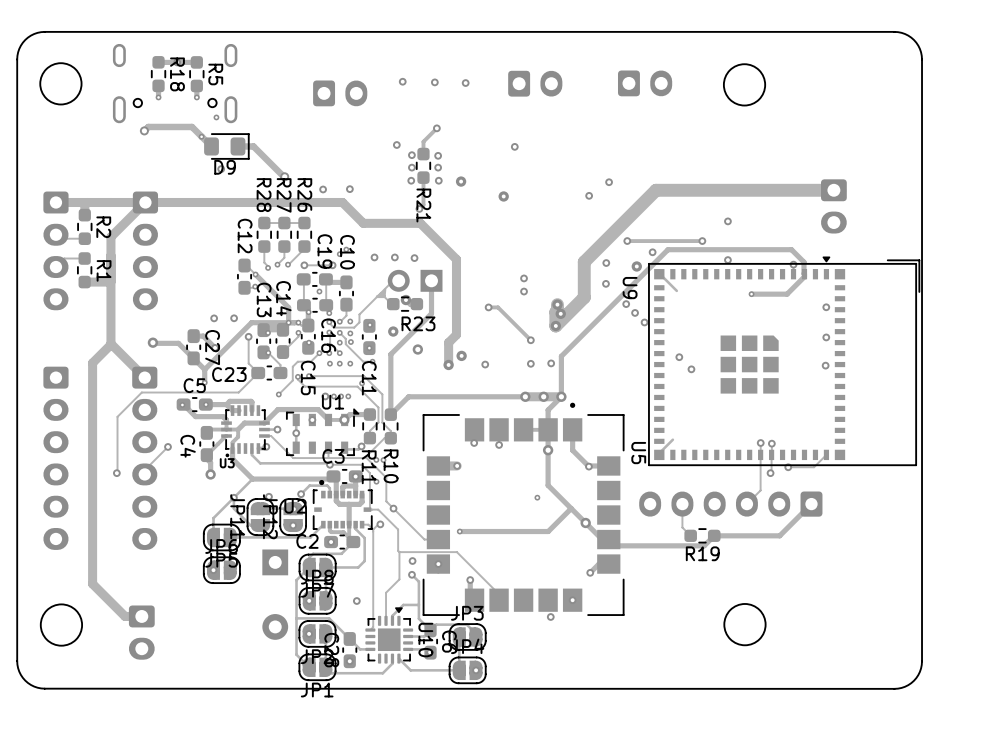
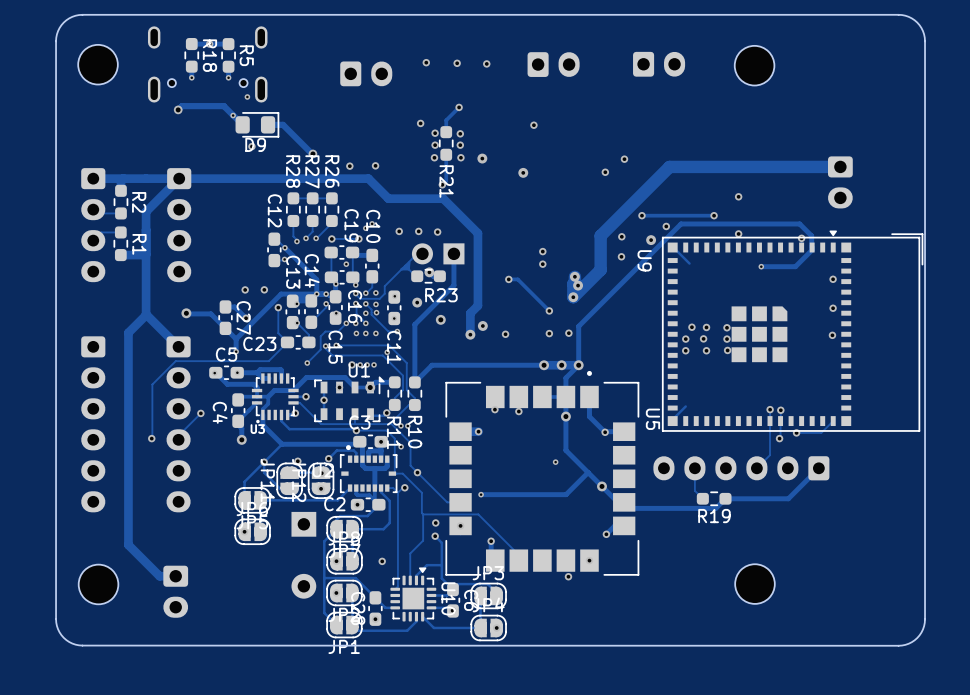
via: (626, 304) -> none
via: (635, 312) -> none
via: (644, 322) -> none
via: none -> (706, 327)
via: none -> (726, 327)
via: none -> (685, 339)
via: none -> (727, 339)
via: none -> (685, 350)
via: none -> (706, 350)
via: none -> (727, 350)

